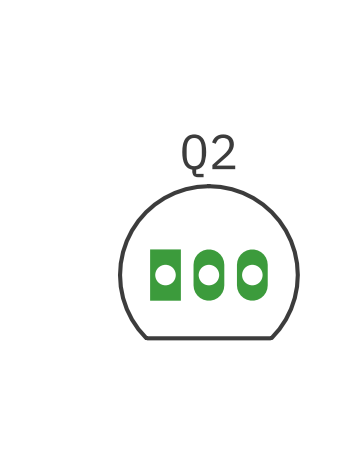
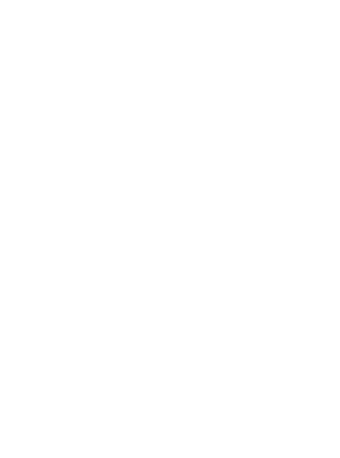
Q2: (208, 262) -> none

